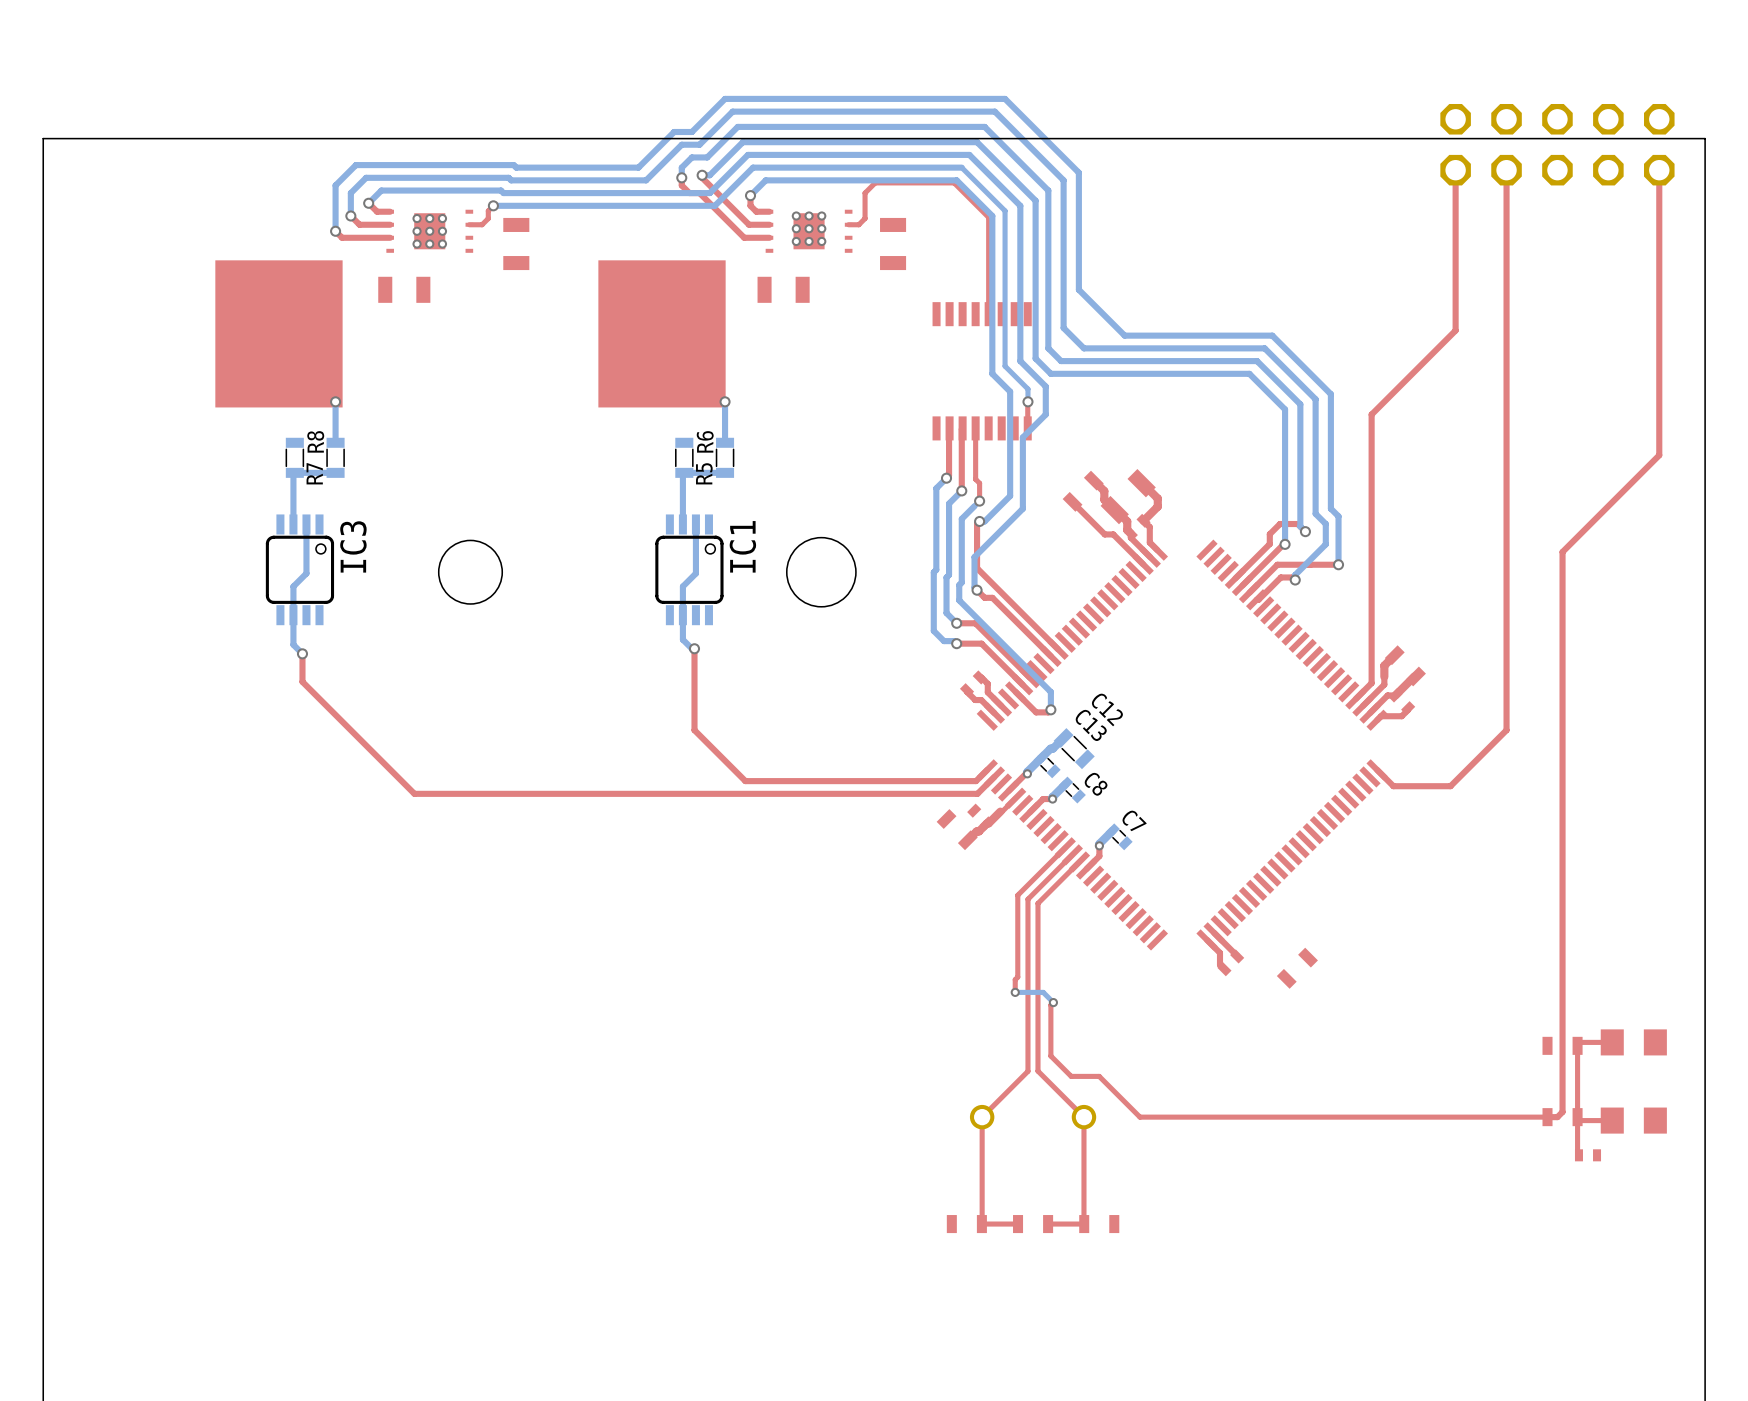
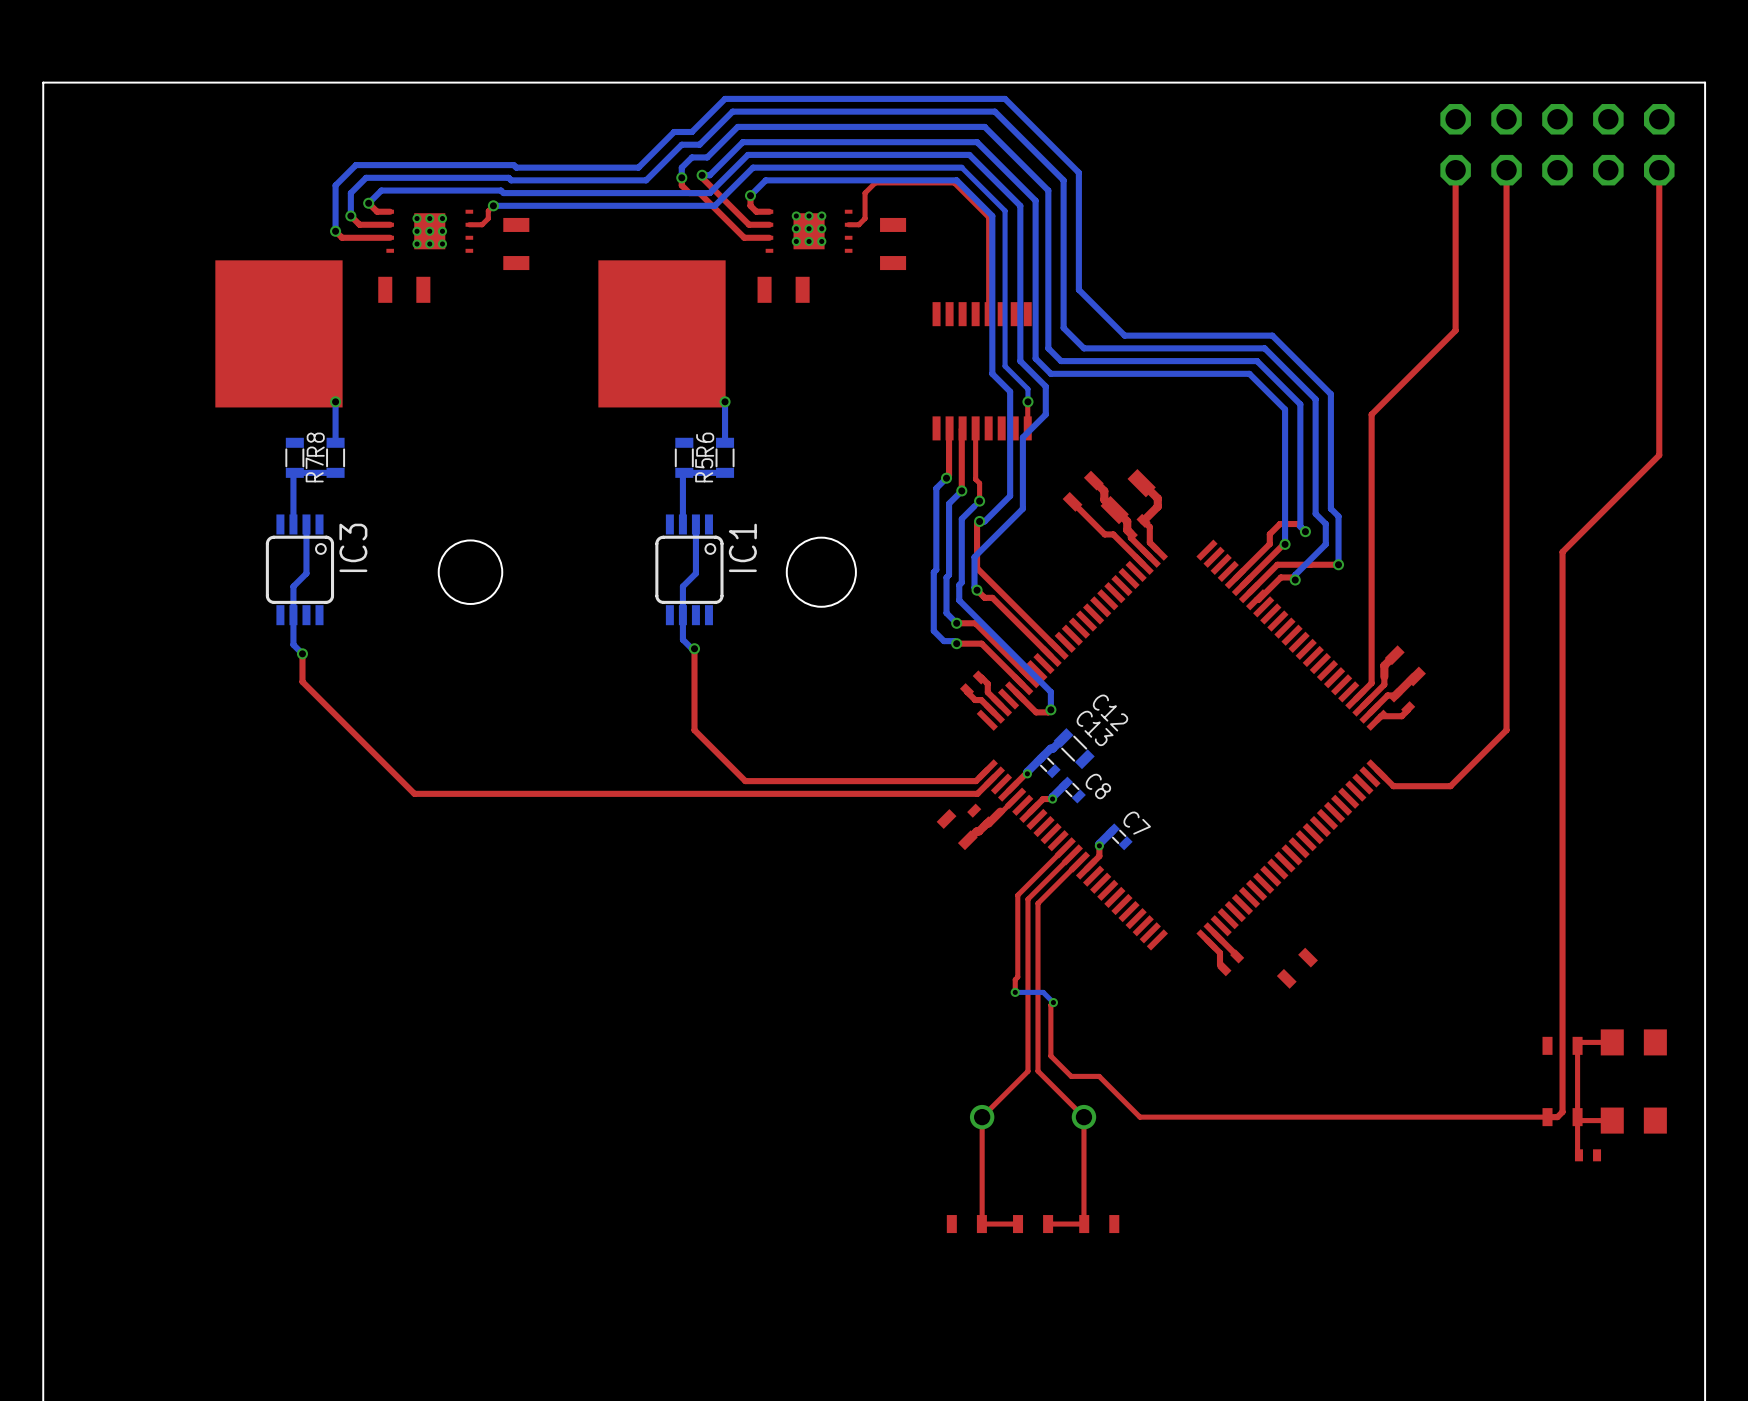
board edge: (1705, 138) (43, 138) -> (1705, 138) (1705, 82) (43, 82) (43, 138)

